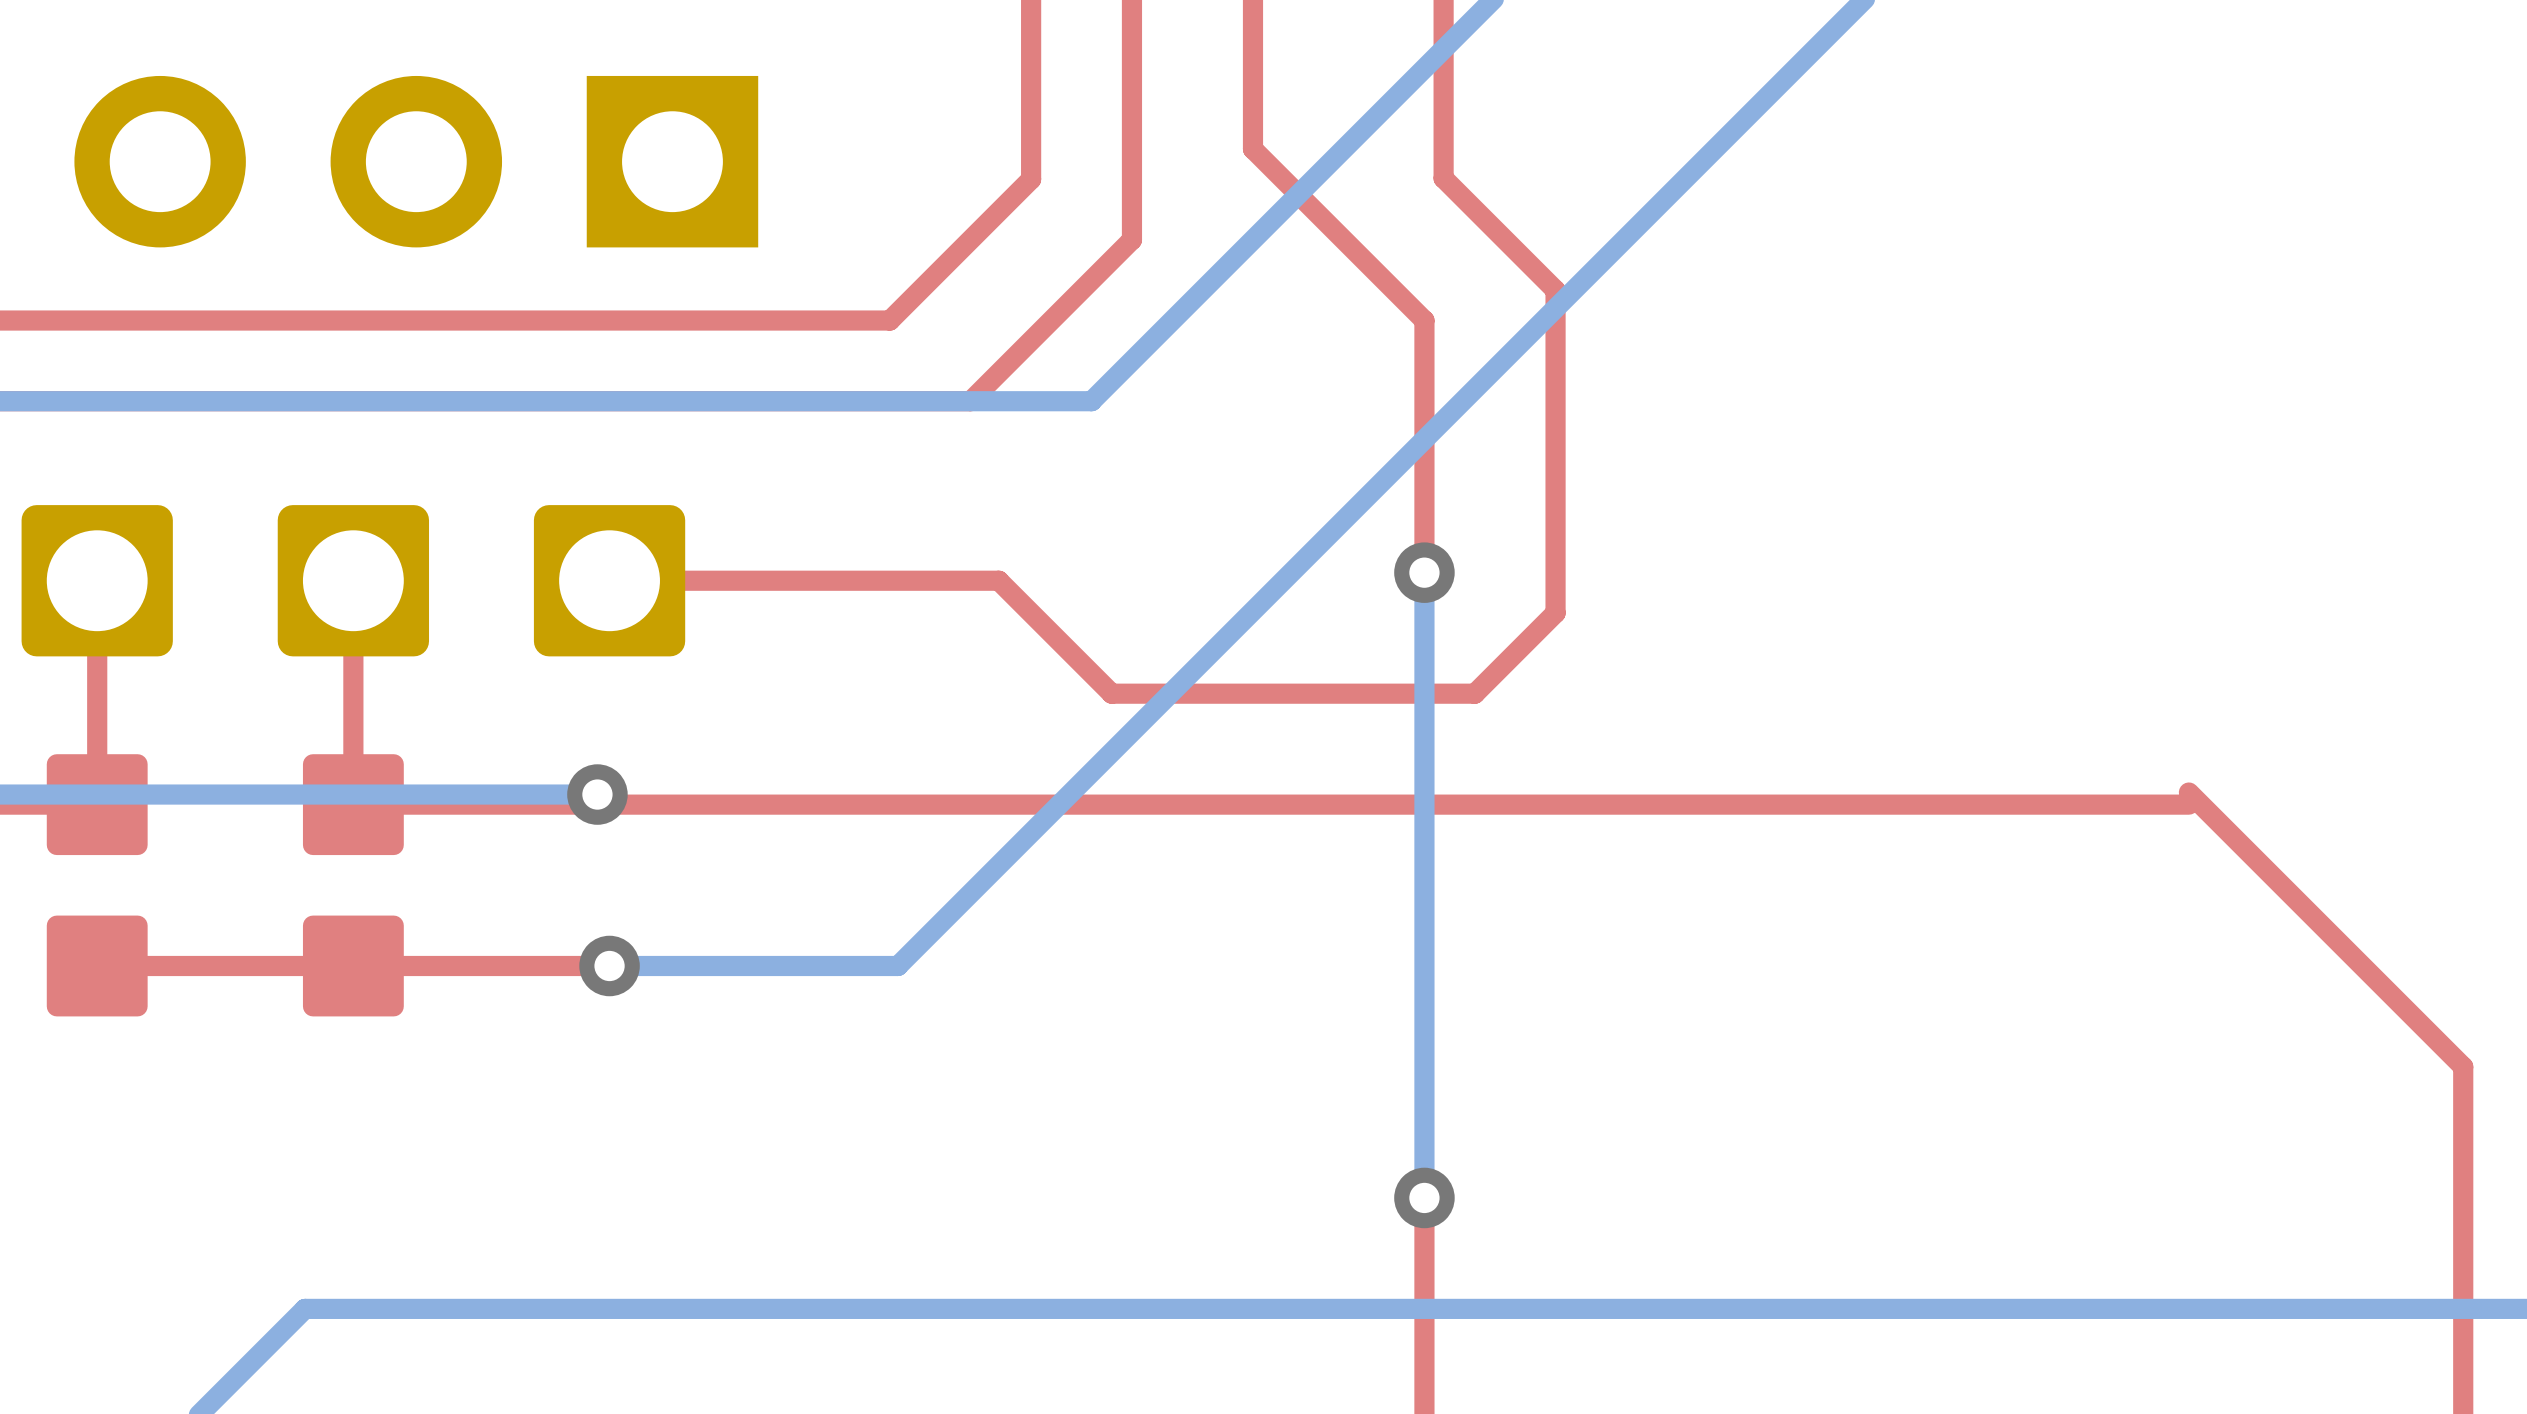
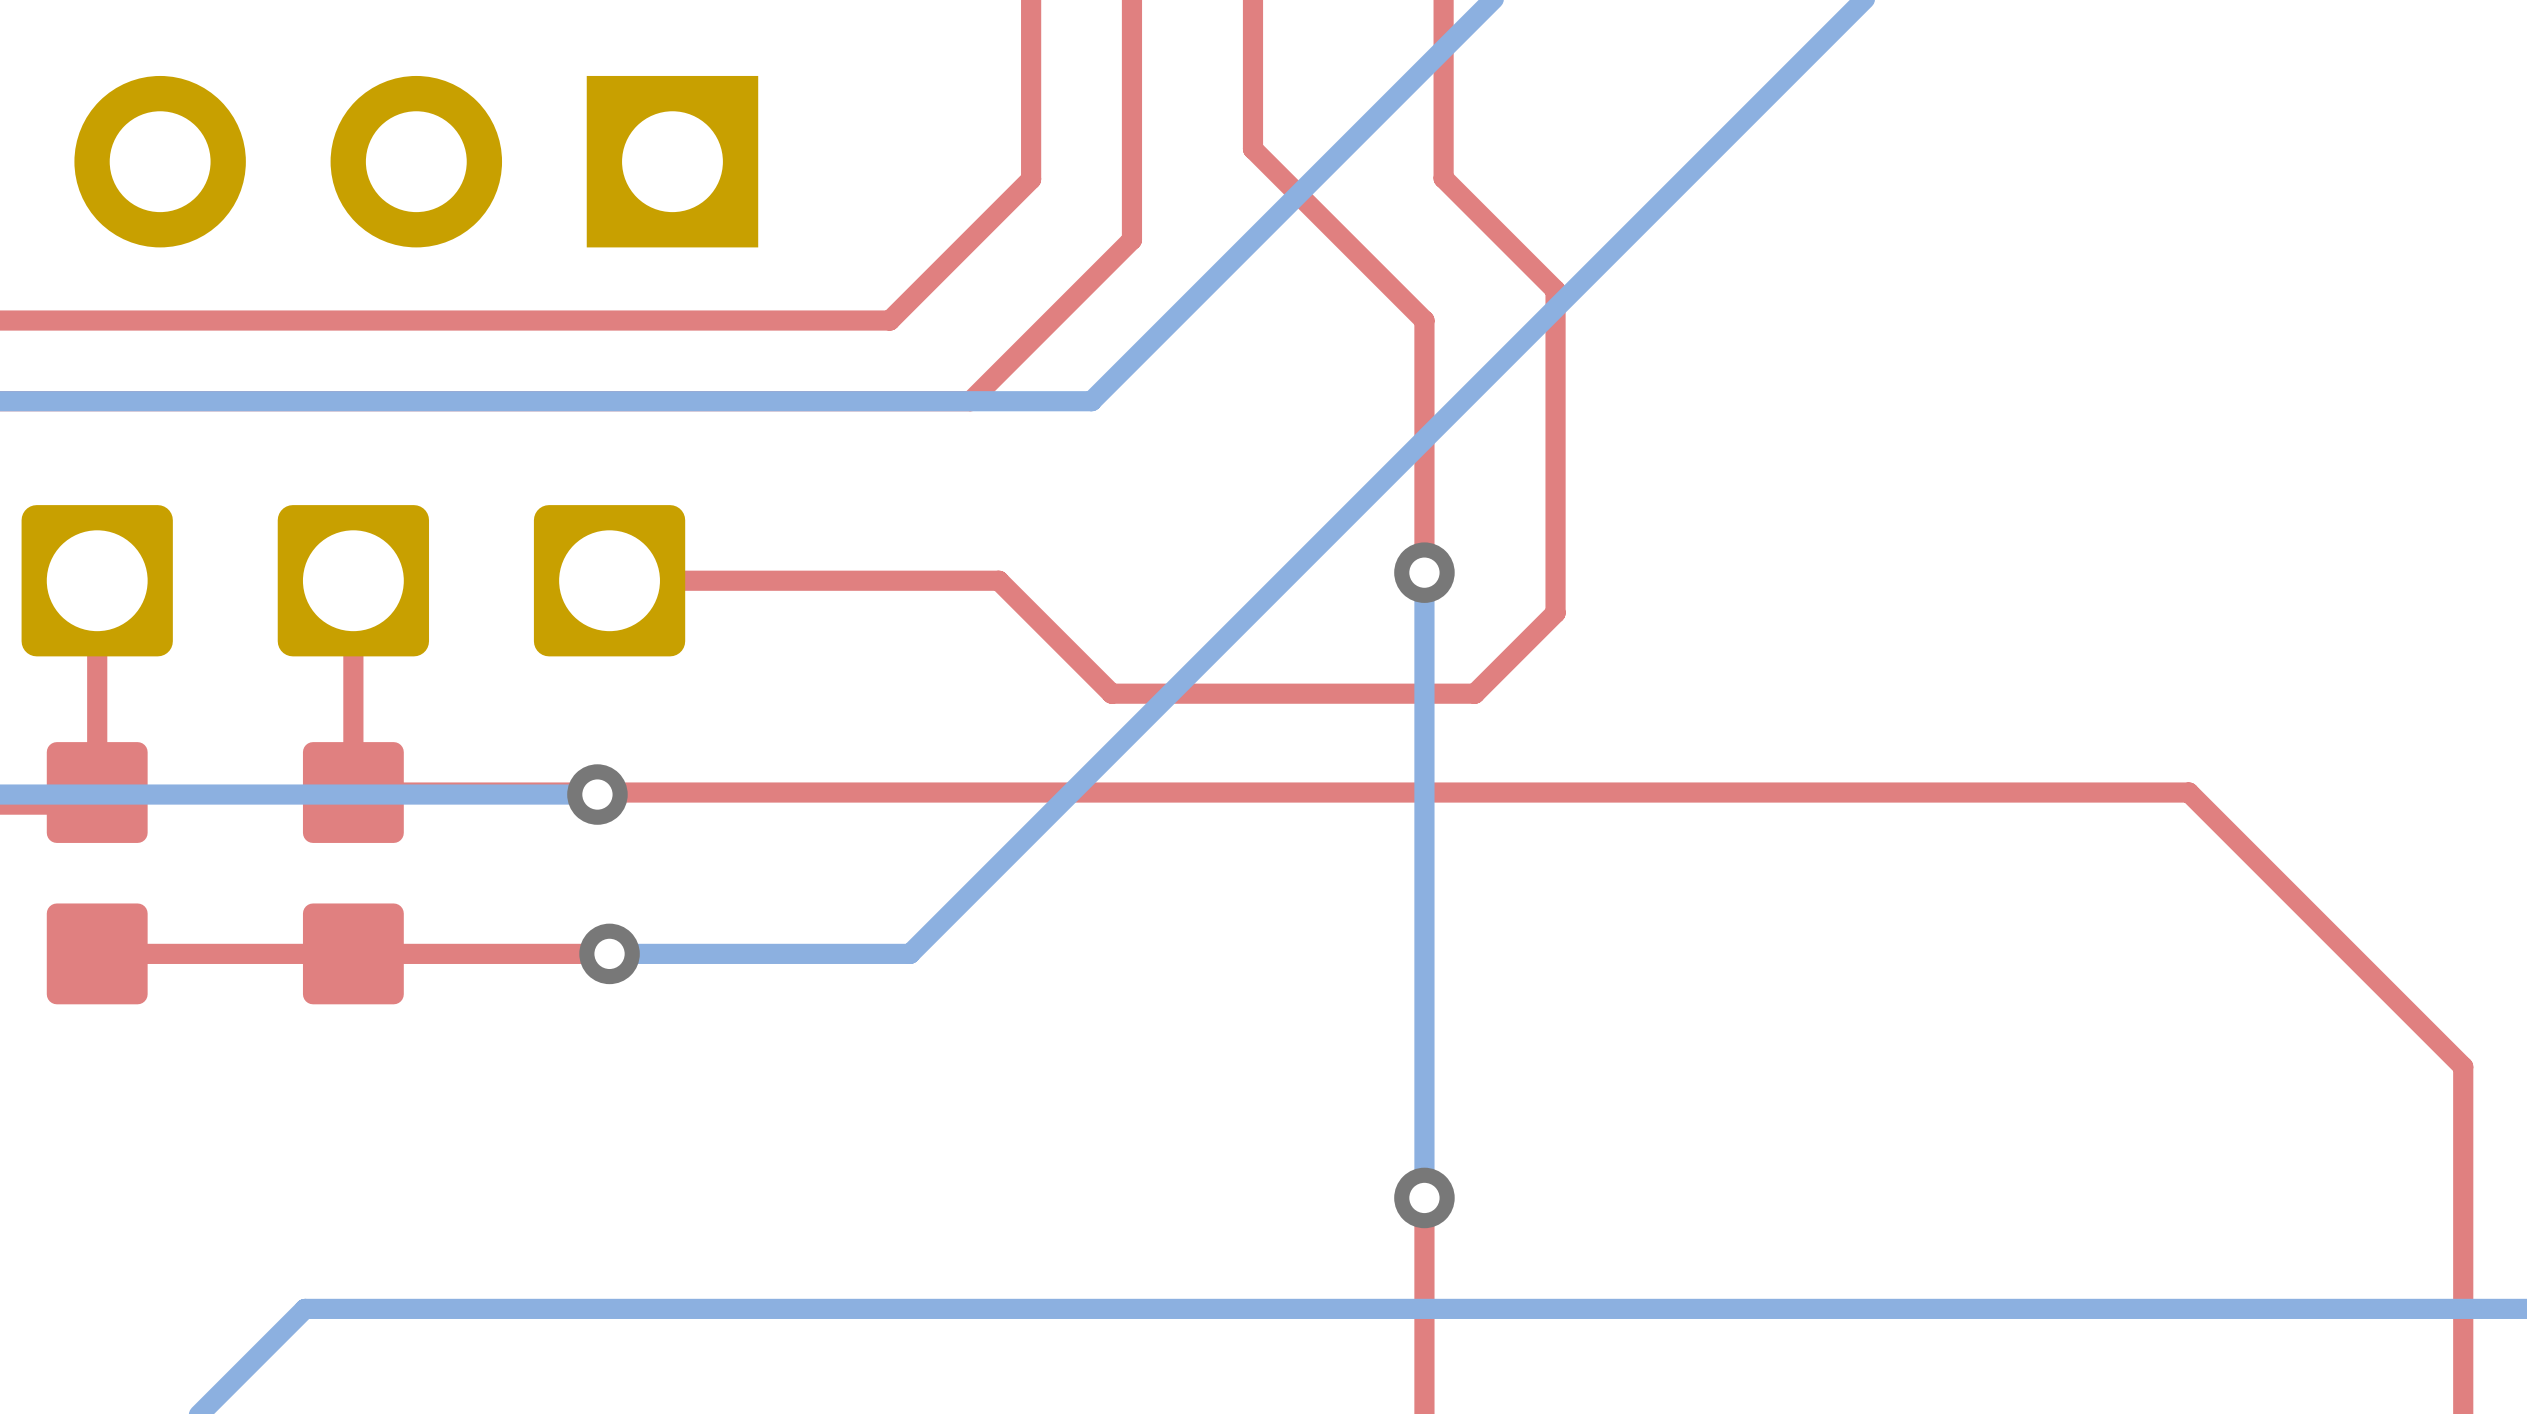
top track: (2188, 804) (353, 804) -> (2188, 792) (353, 792)
part position: (97, 885) -> (97, 873)
part position: (353, 885) -> (353, 873)
bottom track: (910, 953) (897, 965) (609, 965) -> (910, 953) (609, 953)
top track: (609, 965) (97, 965) -> (609, 953) (97, 953)
via position: (609, 965) -> (609, 953)

